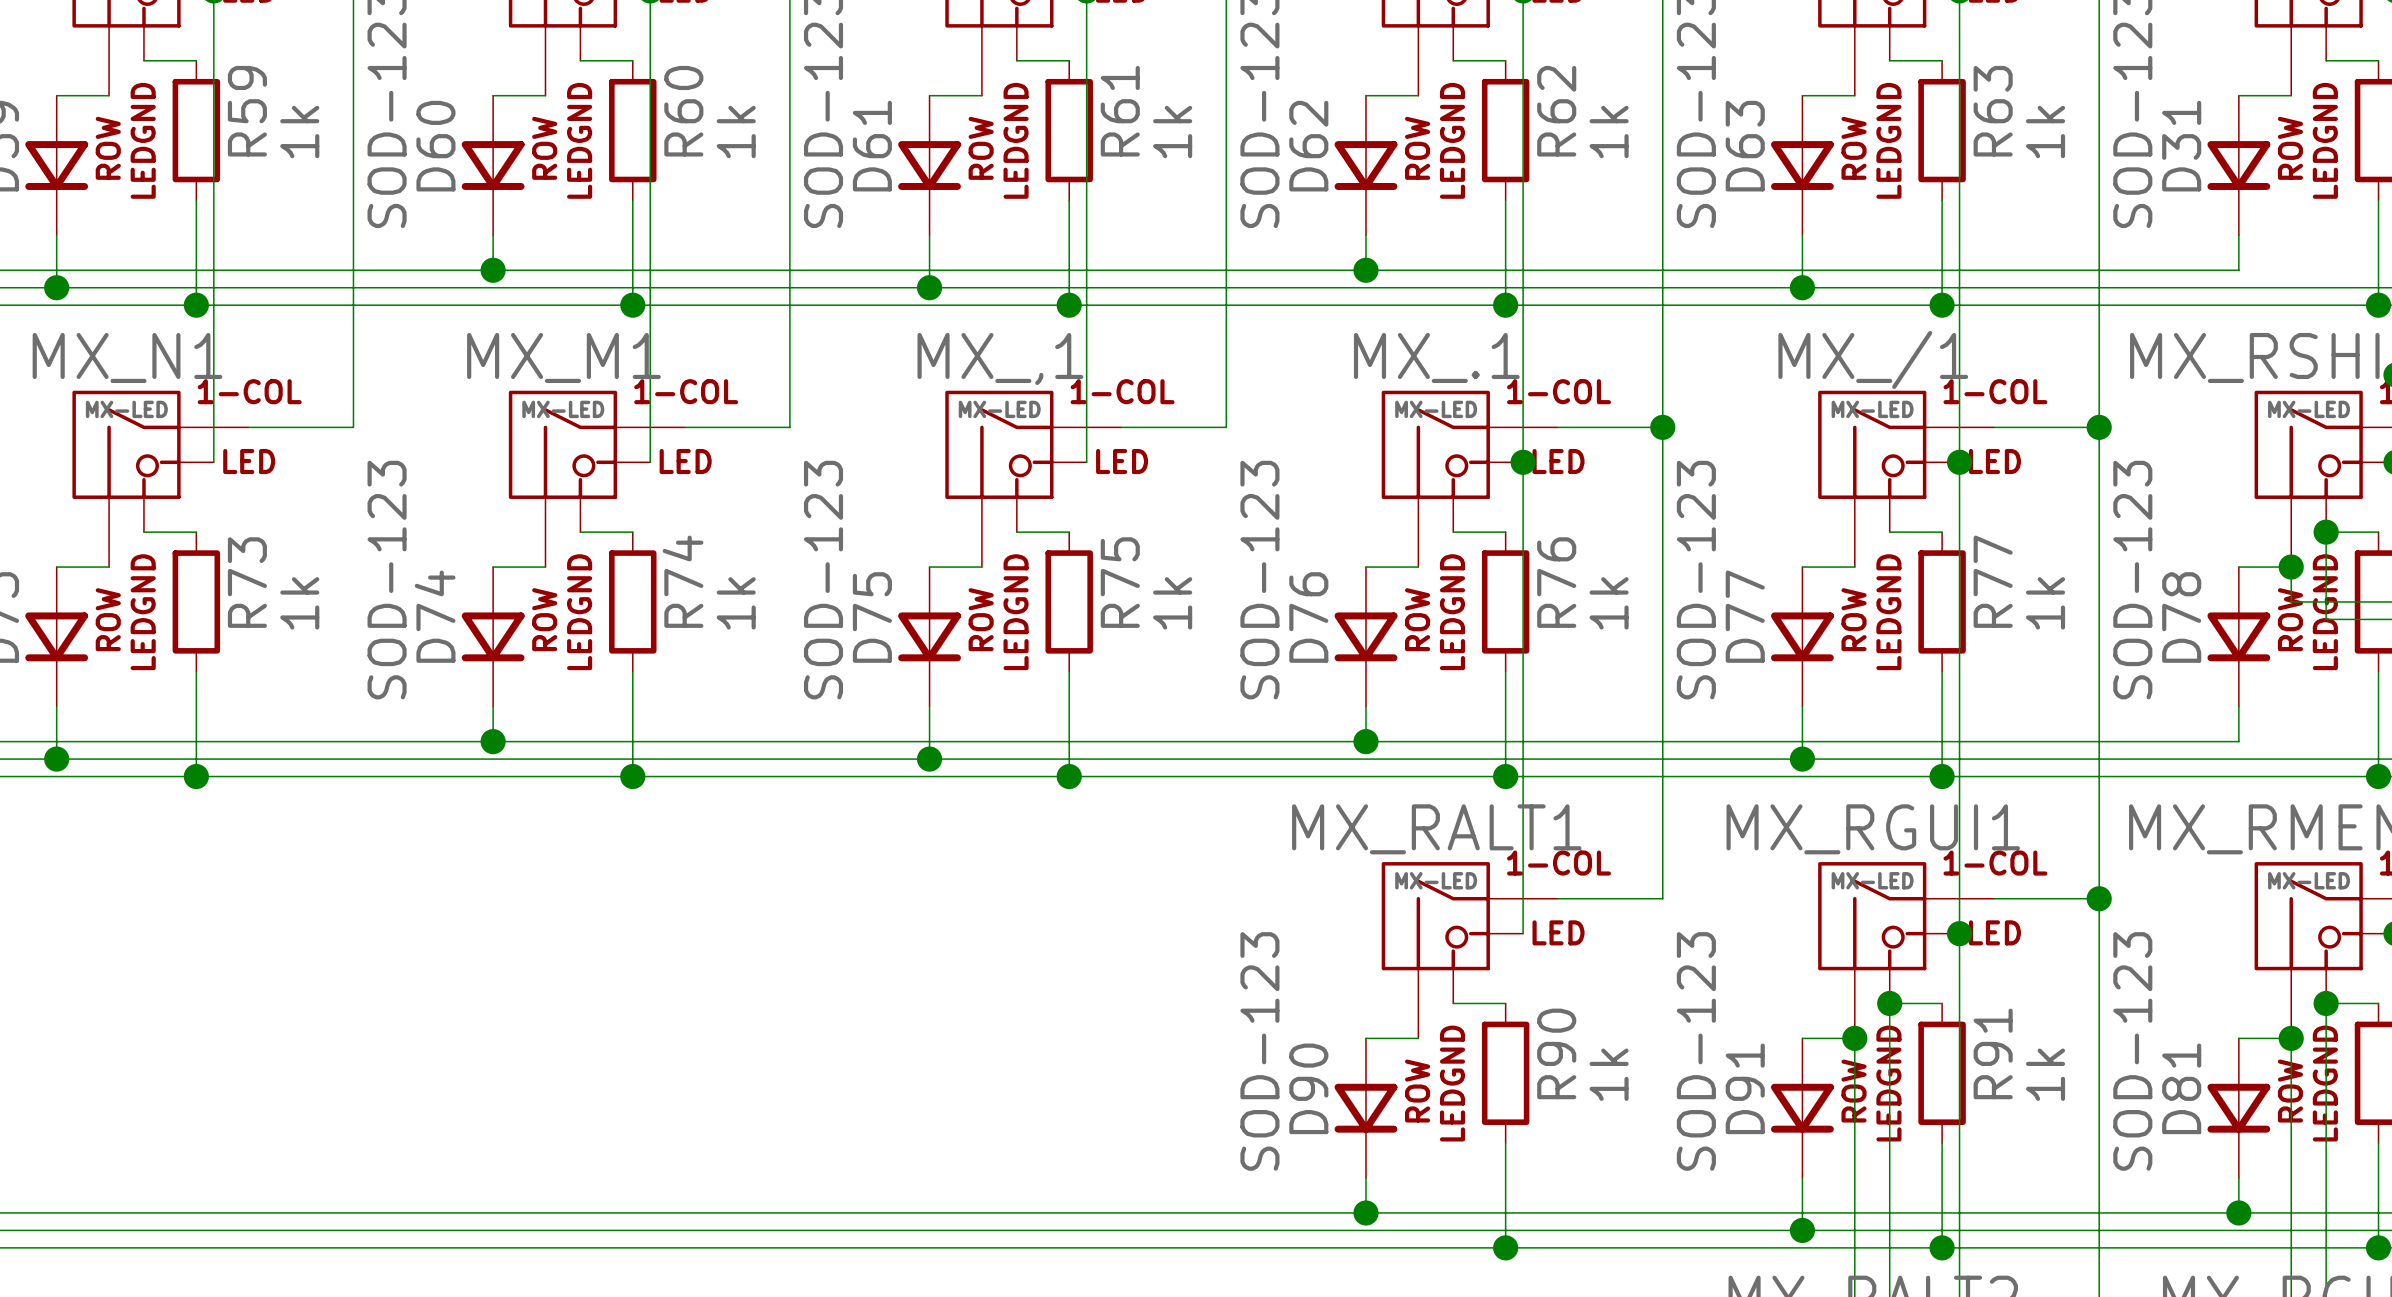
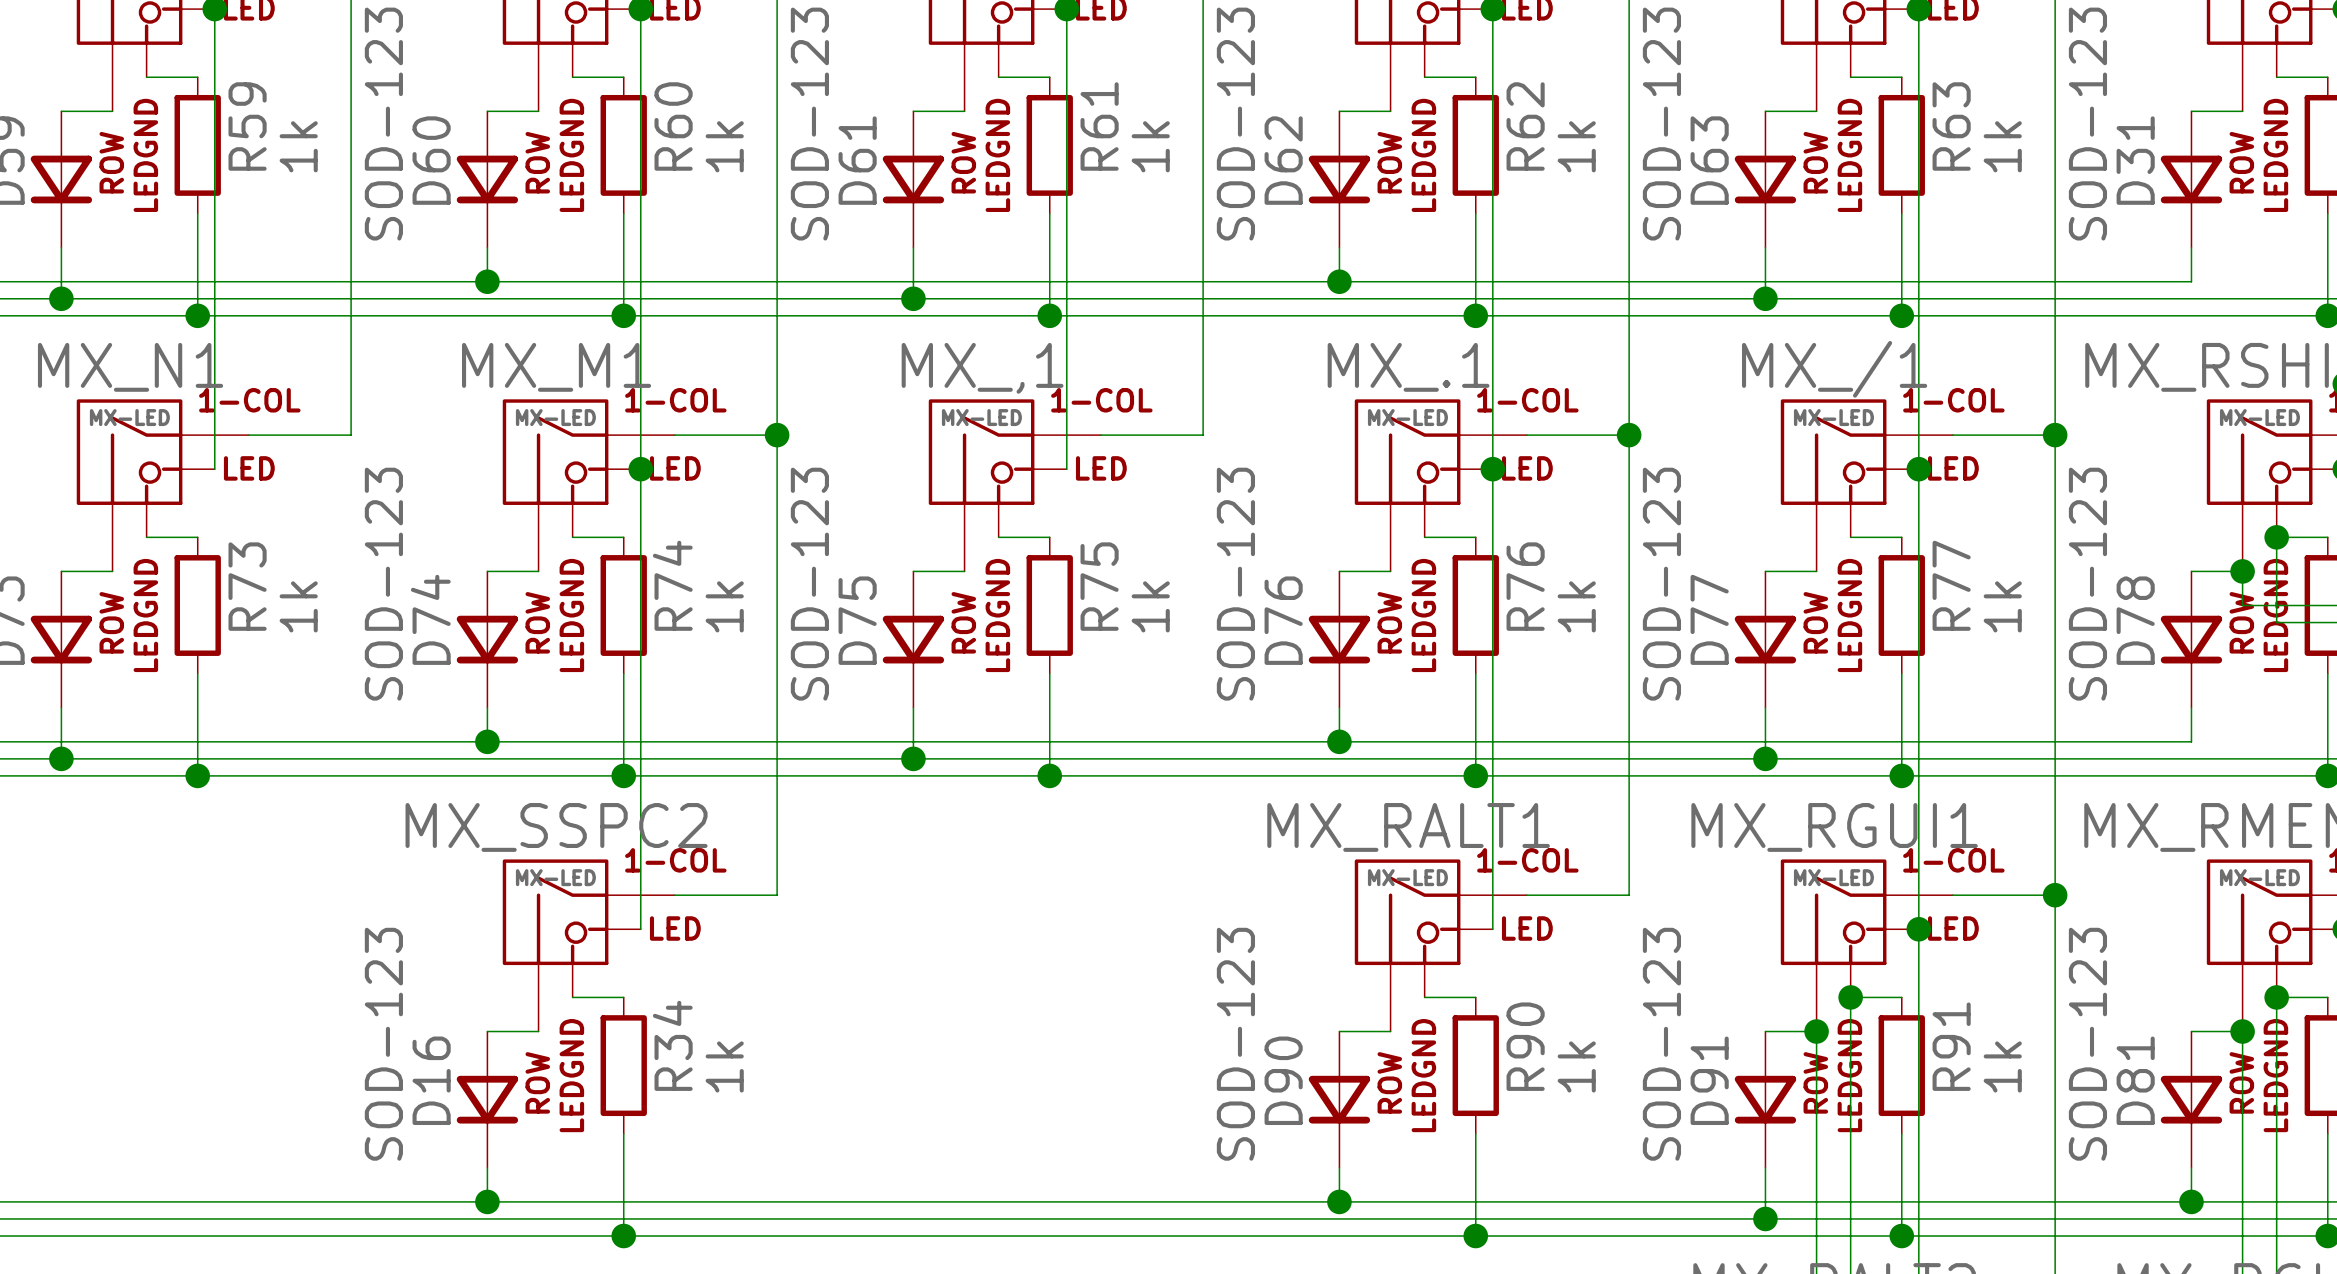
wire: none -> (777, 435) (777, 895) (674, 895)
junction: none -> (777, 435)
wire: none -> (640, 469) (640, 929)
junction: none -> (640, 469)
MX_SSPC2: none -> MX-LED (588, 945)
wire: none -> (572, 997) (623, 997)
wire: none -> (487, 1031) (538, 1031)
R34: none -> 1k (623, 1065)
D16: none -> SOD-123 (487, 1099)
wire: none -> (623, 1133) (623, 1236)
wire: none -> (487, 1167) (487, 1201)
junction: none -> (487, 1201)
junction: none -> (623, 1236)

